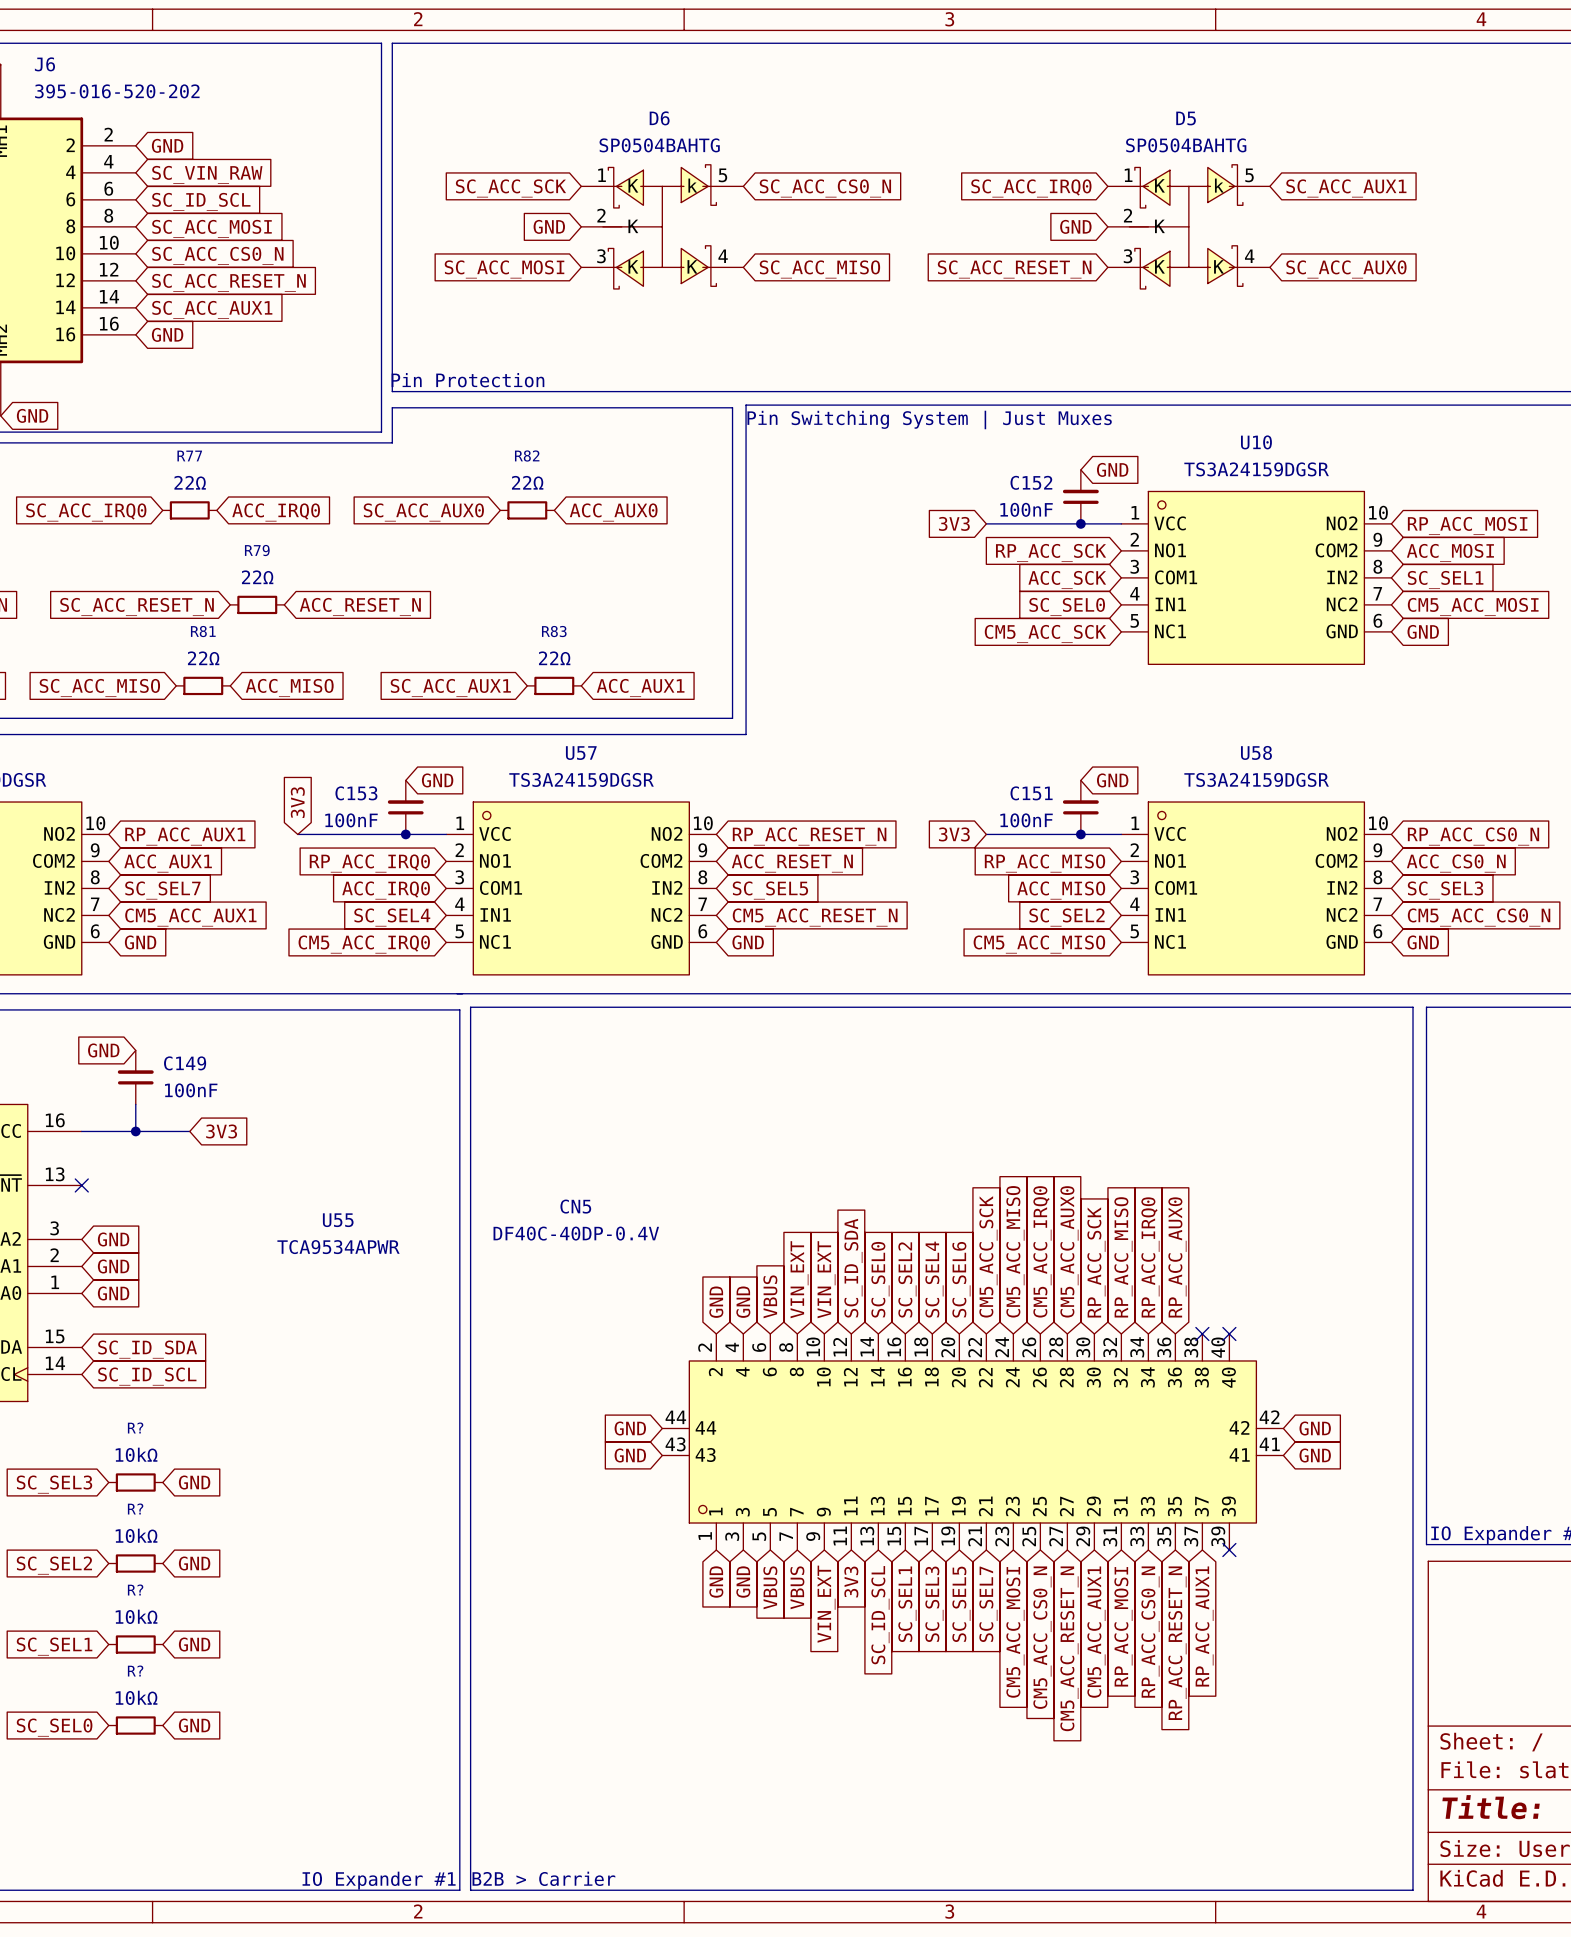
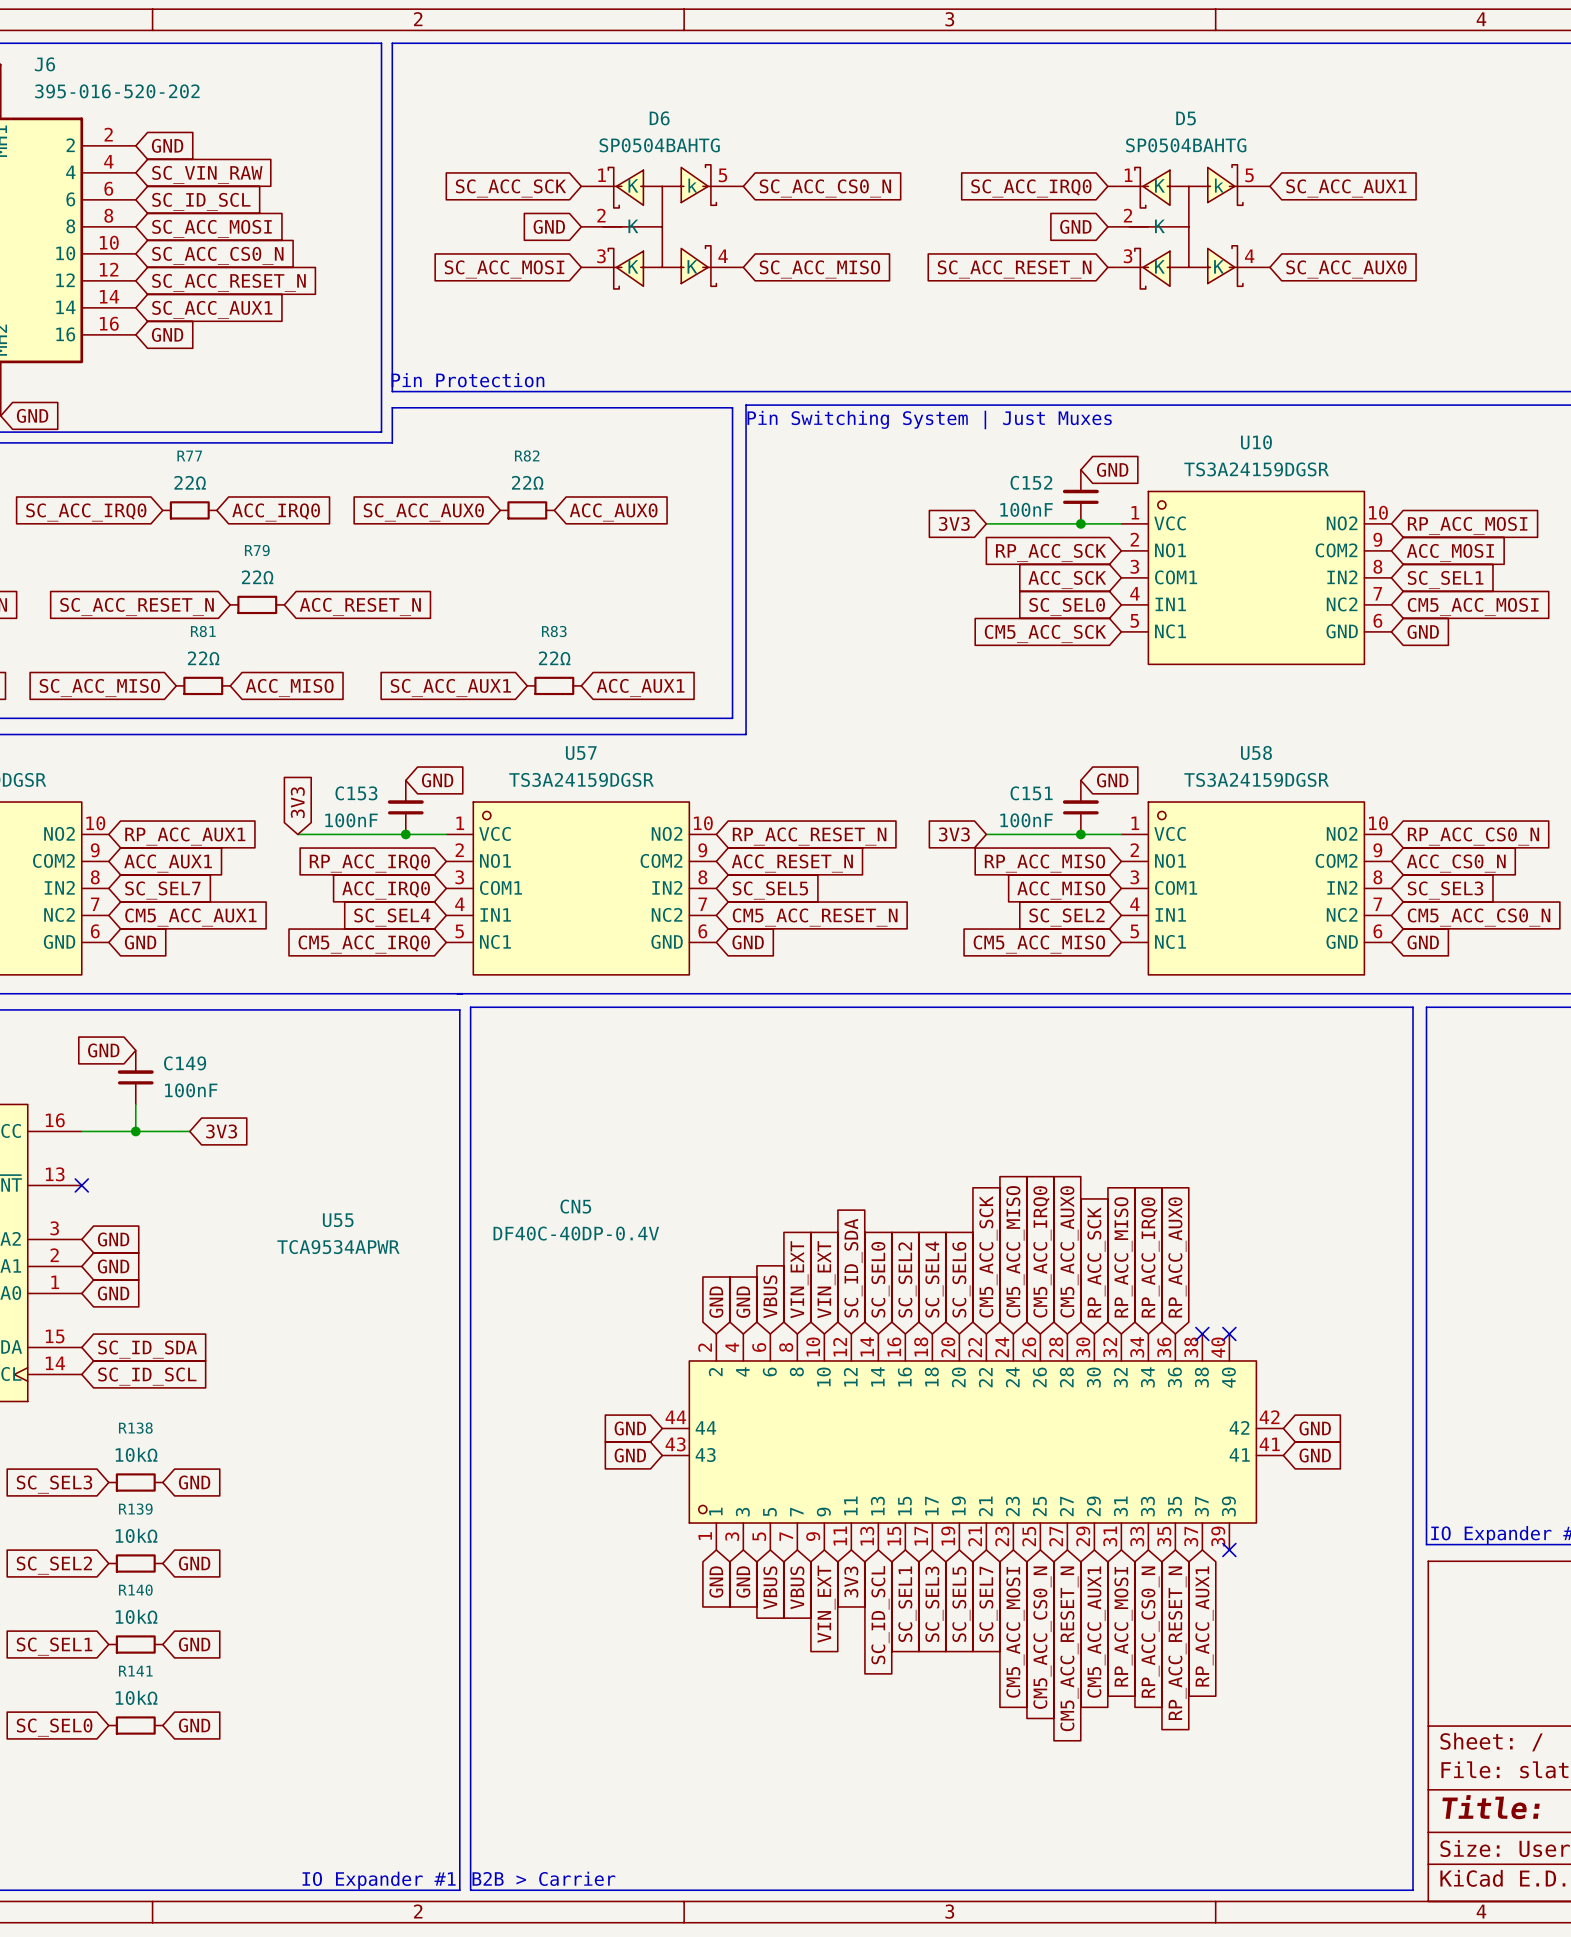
R? name: R? (135, 1427) -> R138 (135, 1428)
R? name: R? (135, 1509) -> R139 (135, 1509)
R? name: R? (135, 1590) -> R140 (135, 1590)
R? name: R? (135, 1671) -> R141 (135, 1671)

